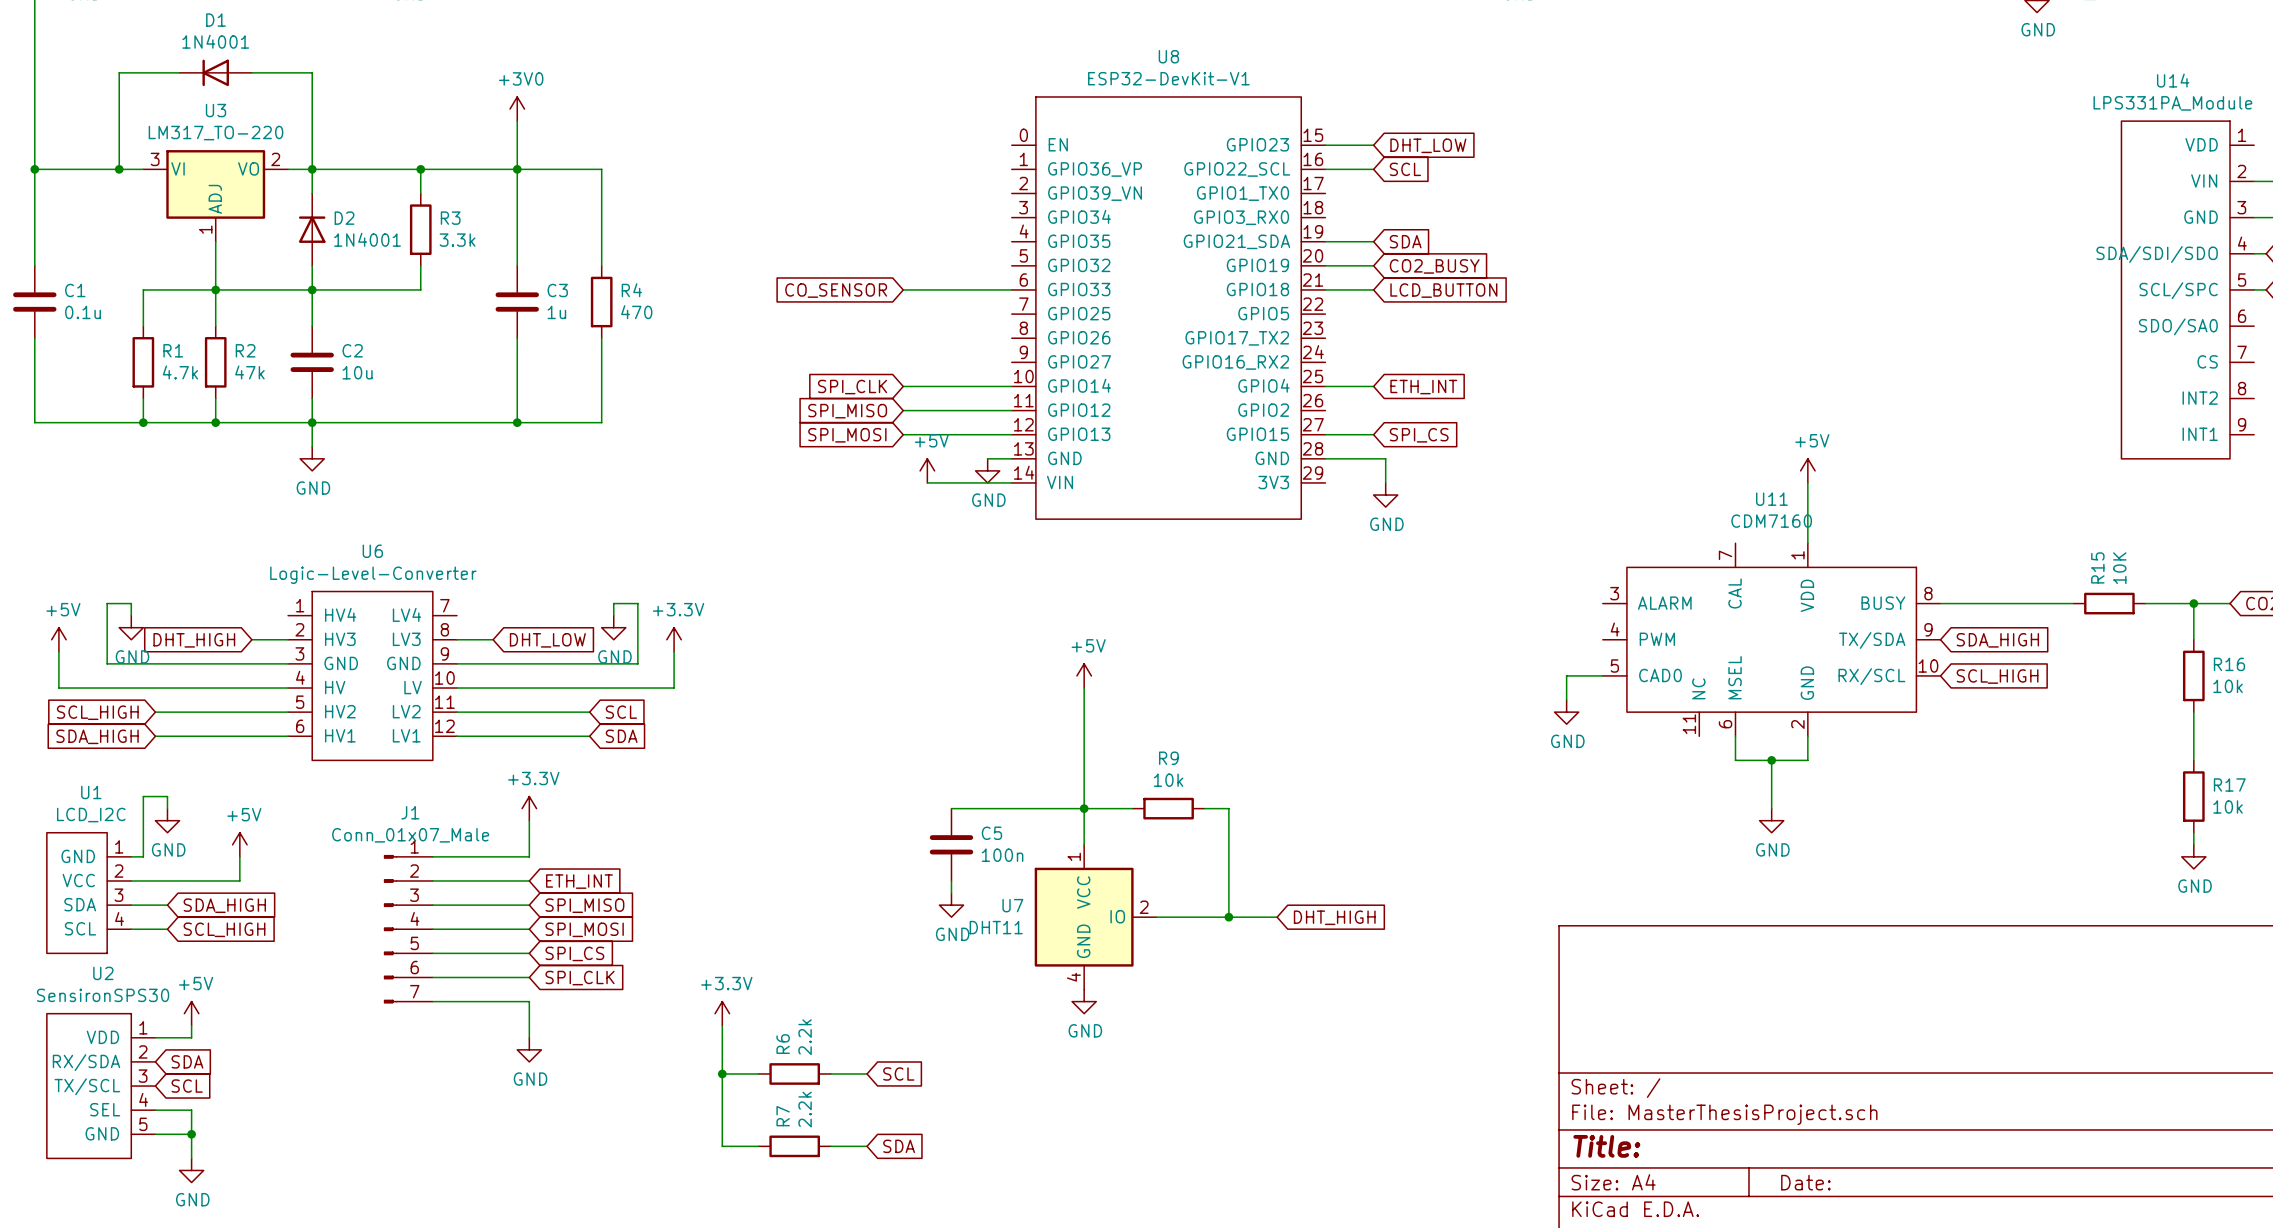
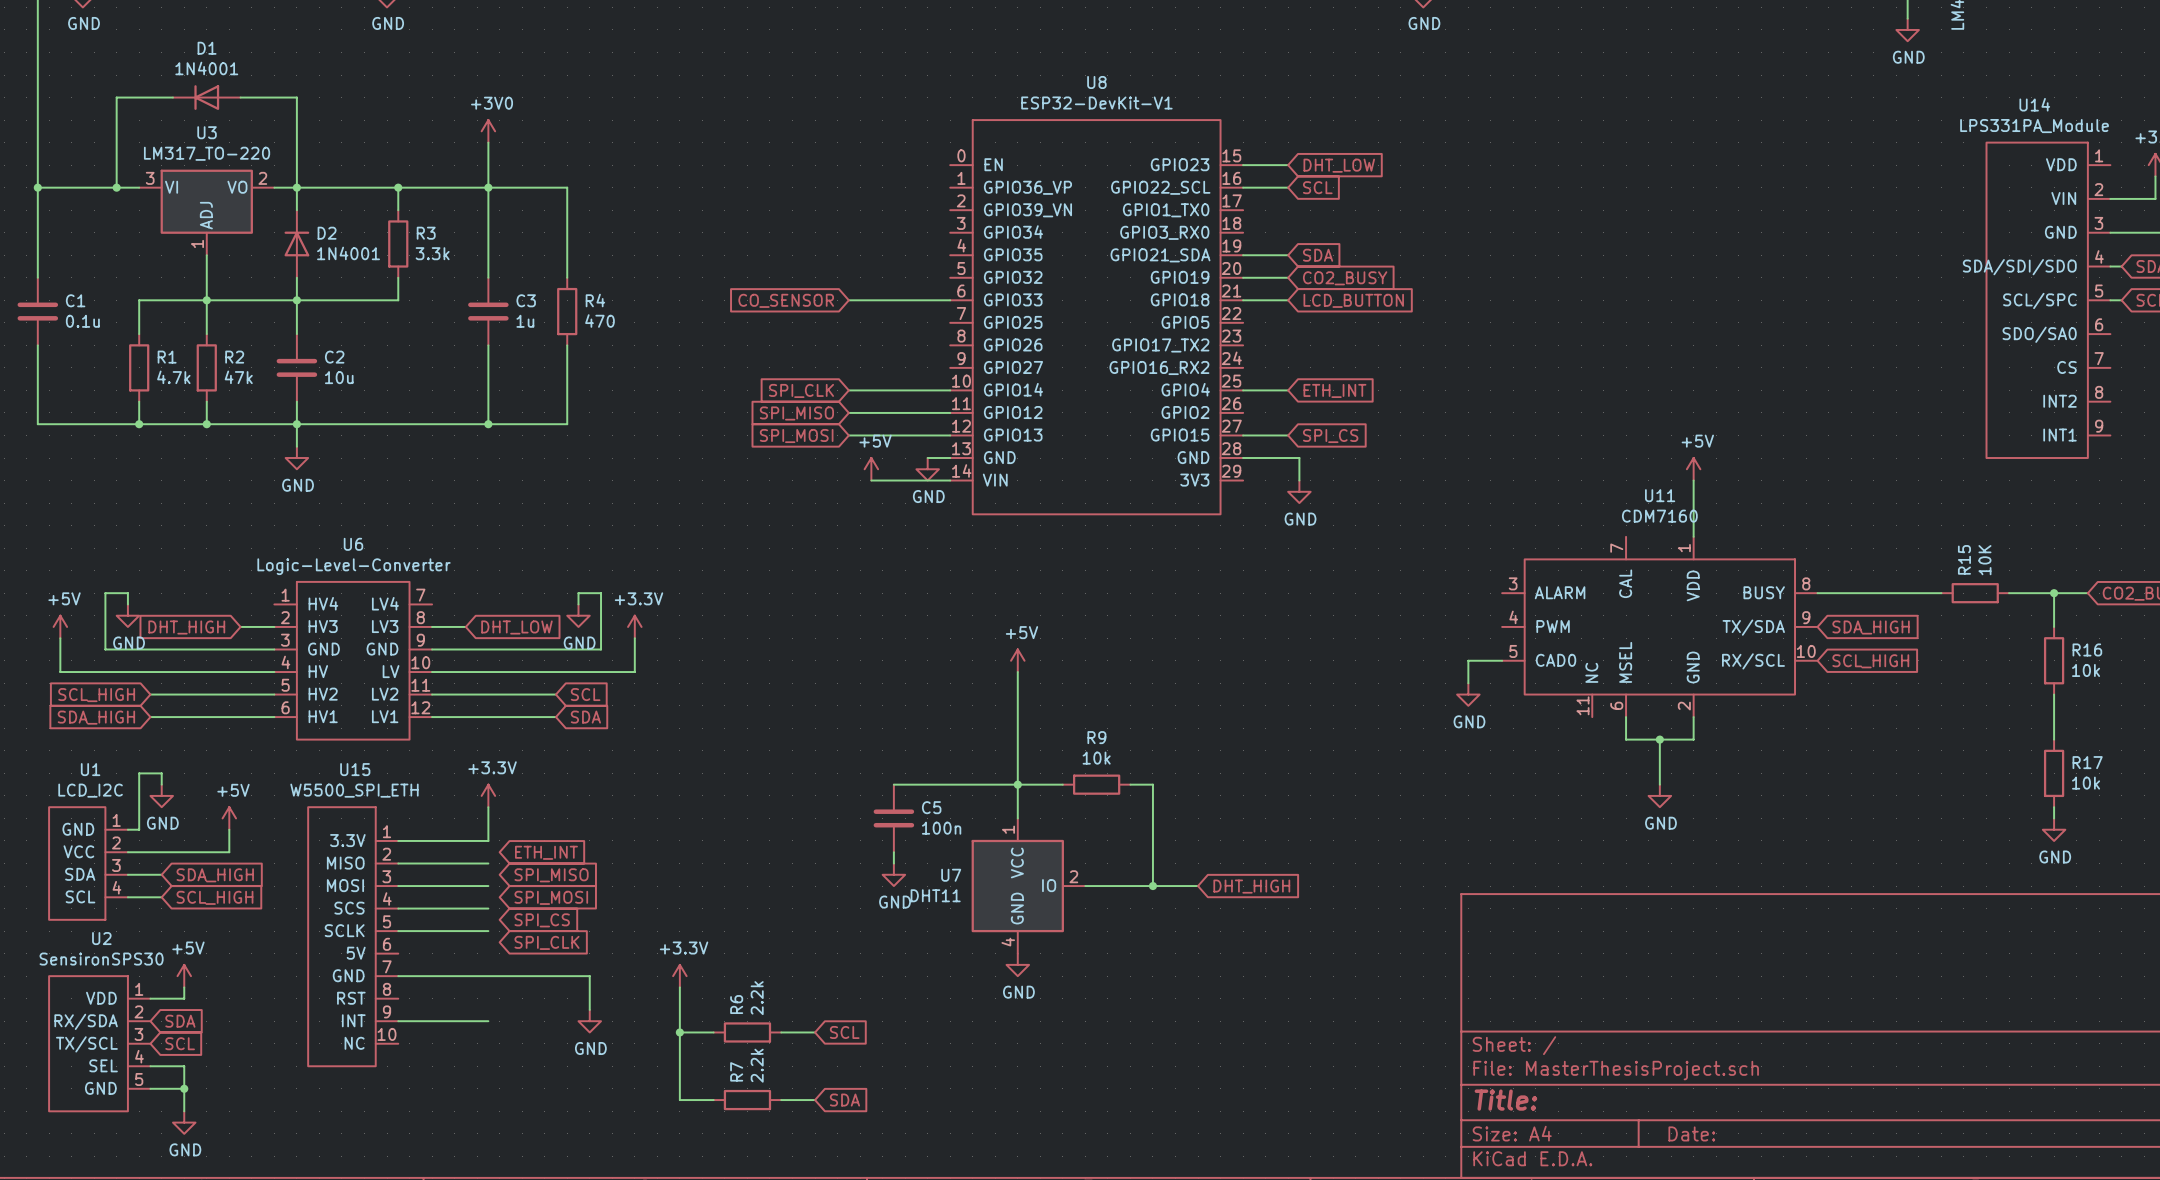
power symbol position: +3.3V (529, 808) -> +3.3V (488, 795)
wire: (529, 820) (529, 856) (432, 856) -> (488, 807) (488, 840) (398, 840)
wire: (432, 880) (529, 880) -> (398, 863) (488, 863)
wire: (432, 905) (529, 905) -> (398, 886) (488, 886)
J1: Conn_01x07_Male (408, 929) -> none
wire: (432, 929) (529, 929) -> (398, 908) (488, 908)
wire: (432, 953) (529, 953) -> (398, 931) (488, 931)
U15: none -> W5500_SPI_ETH (353, 936)
wire: (432, 977) (529, 977) -> (398, 1021) (488, 1021)
wire: (432, 1001) (529, 1001) (529, 1037) -> none
wire: none -> (398, 976) (589, 976) (589, 1009)
power symbol position: GND (529, 1049) -> GND (589, 1021)

